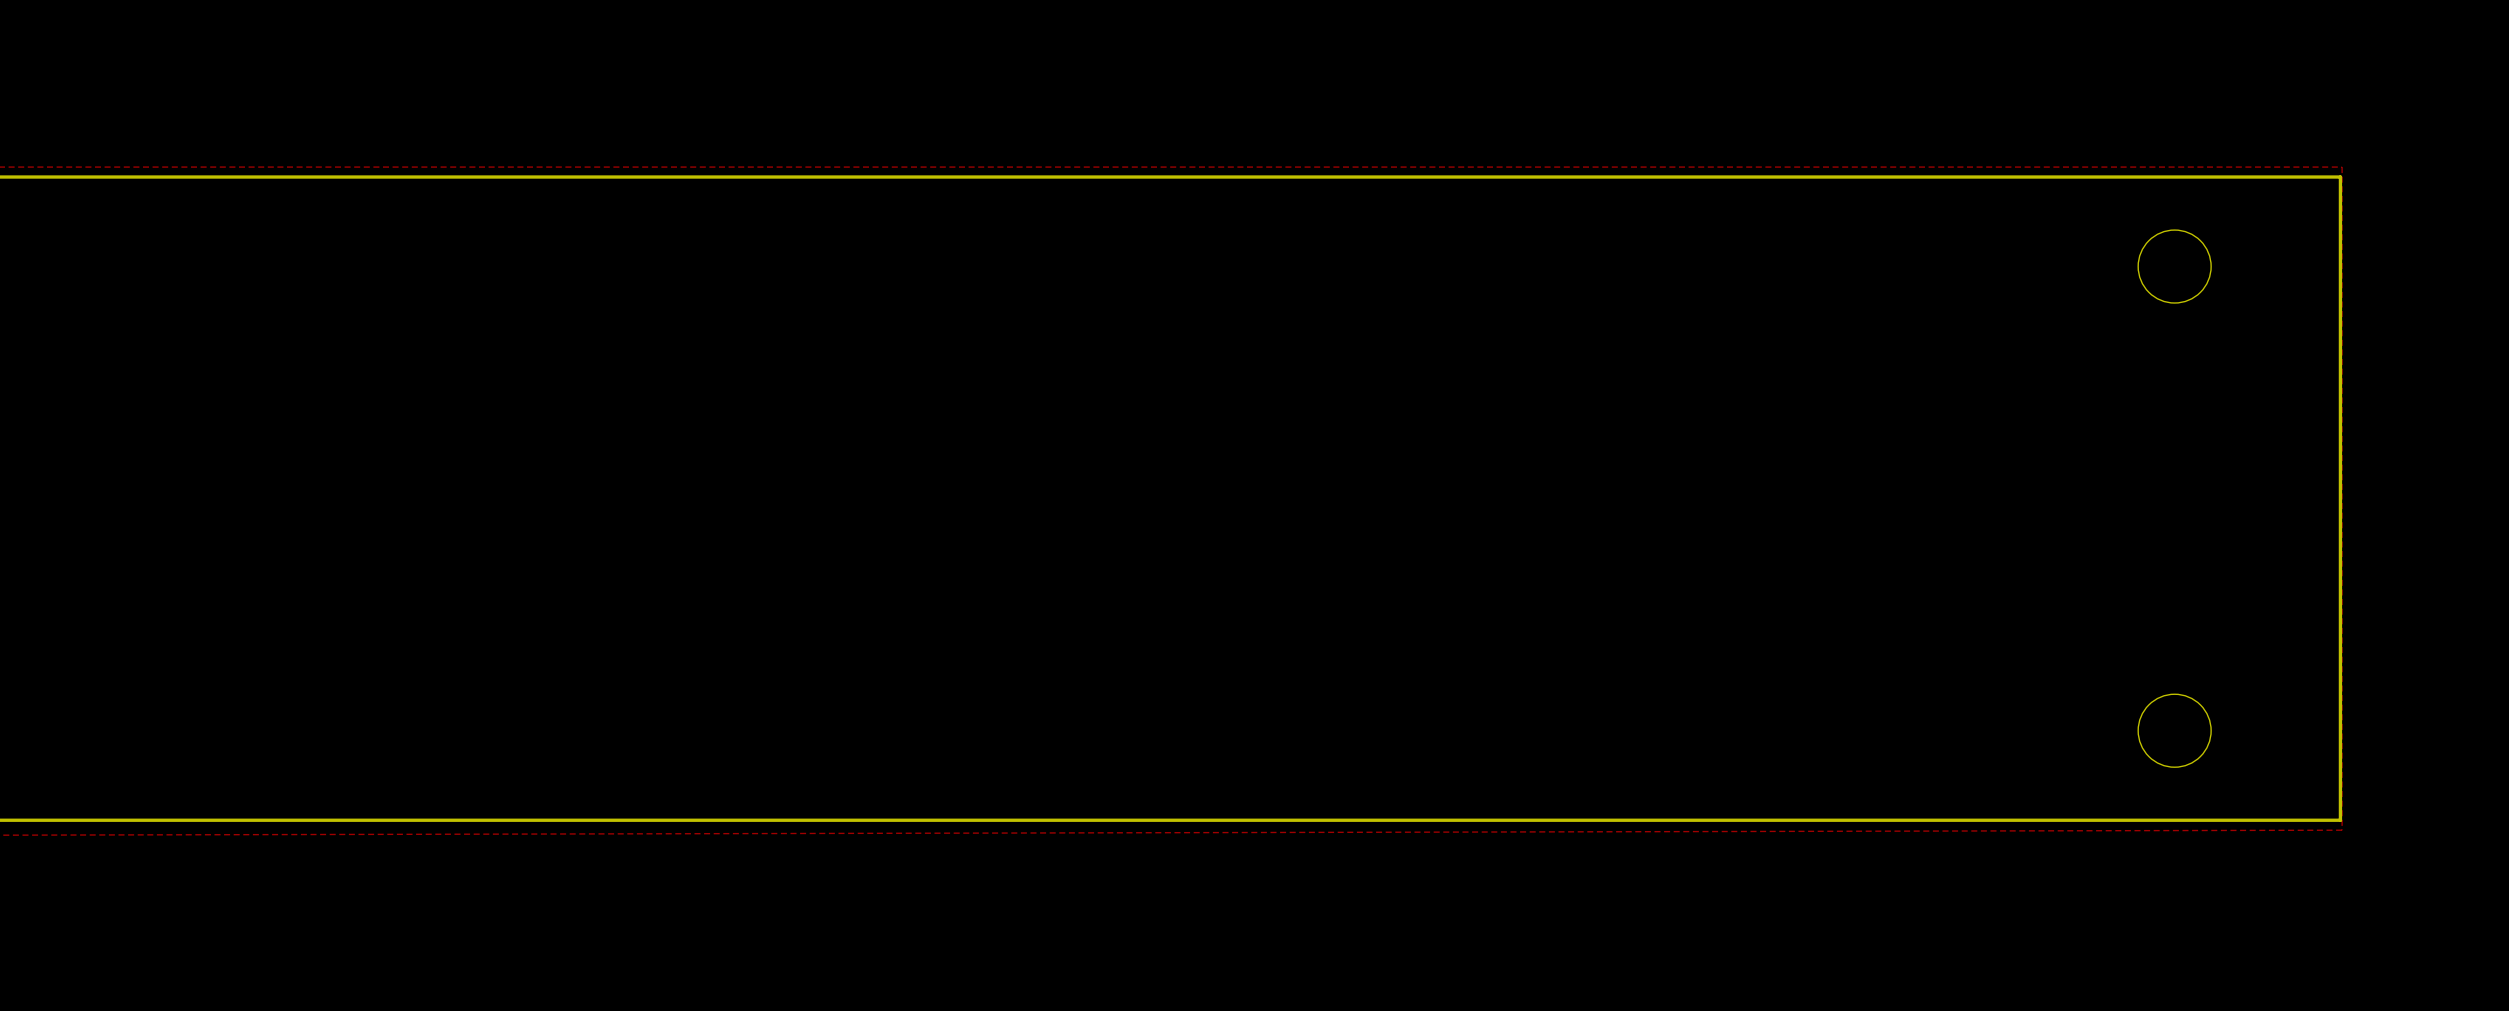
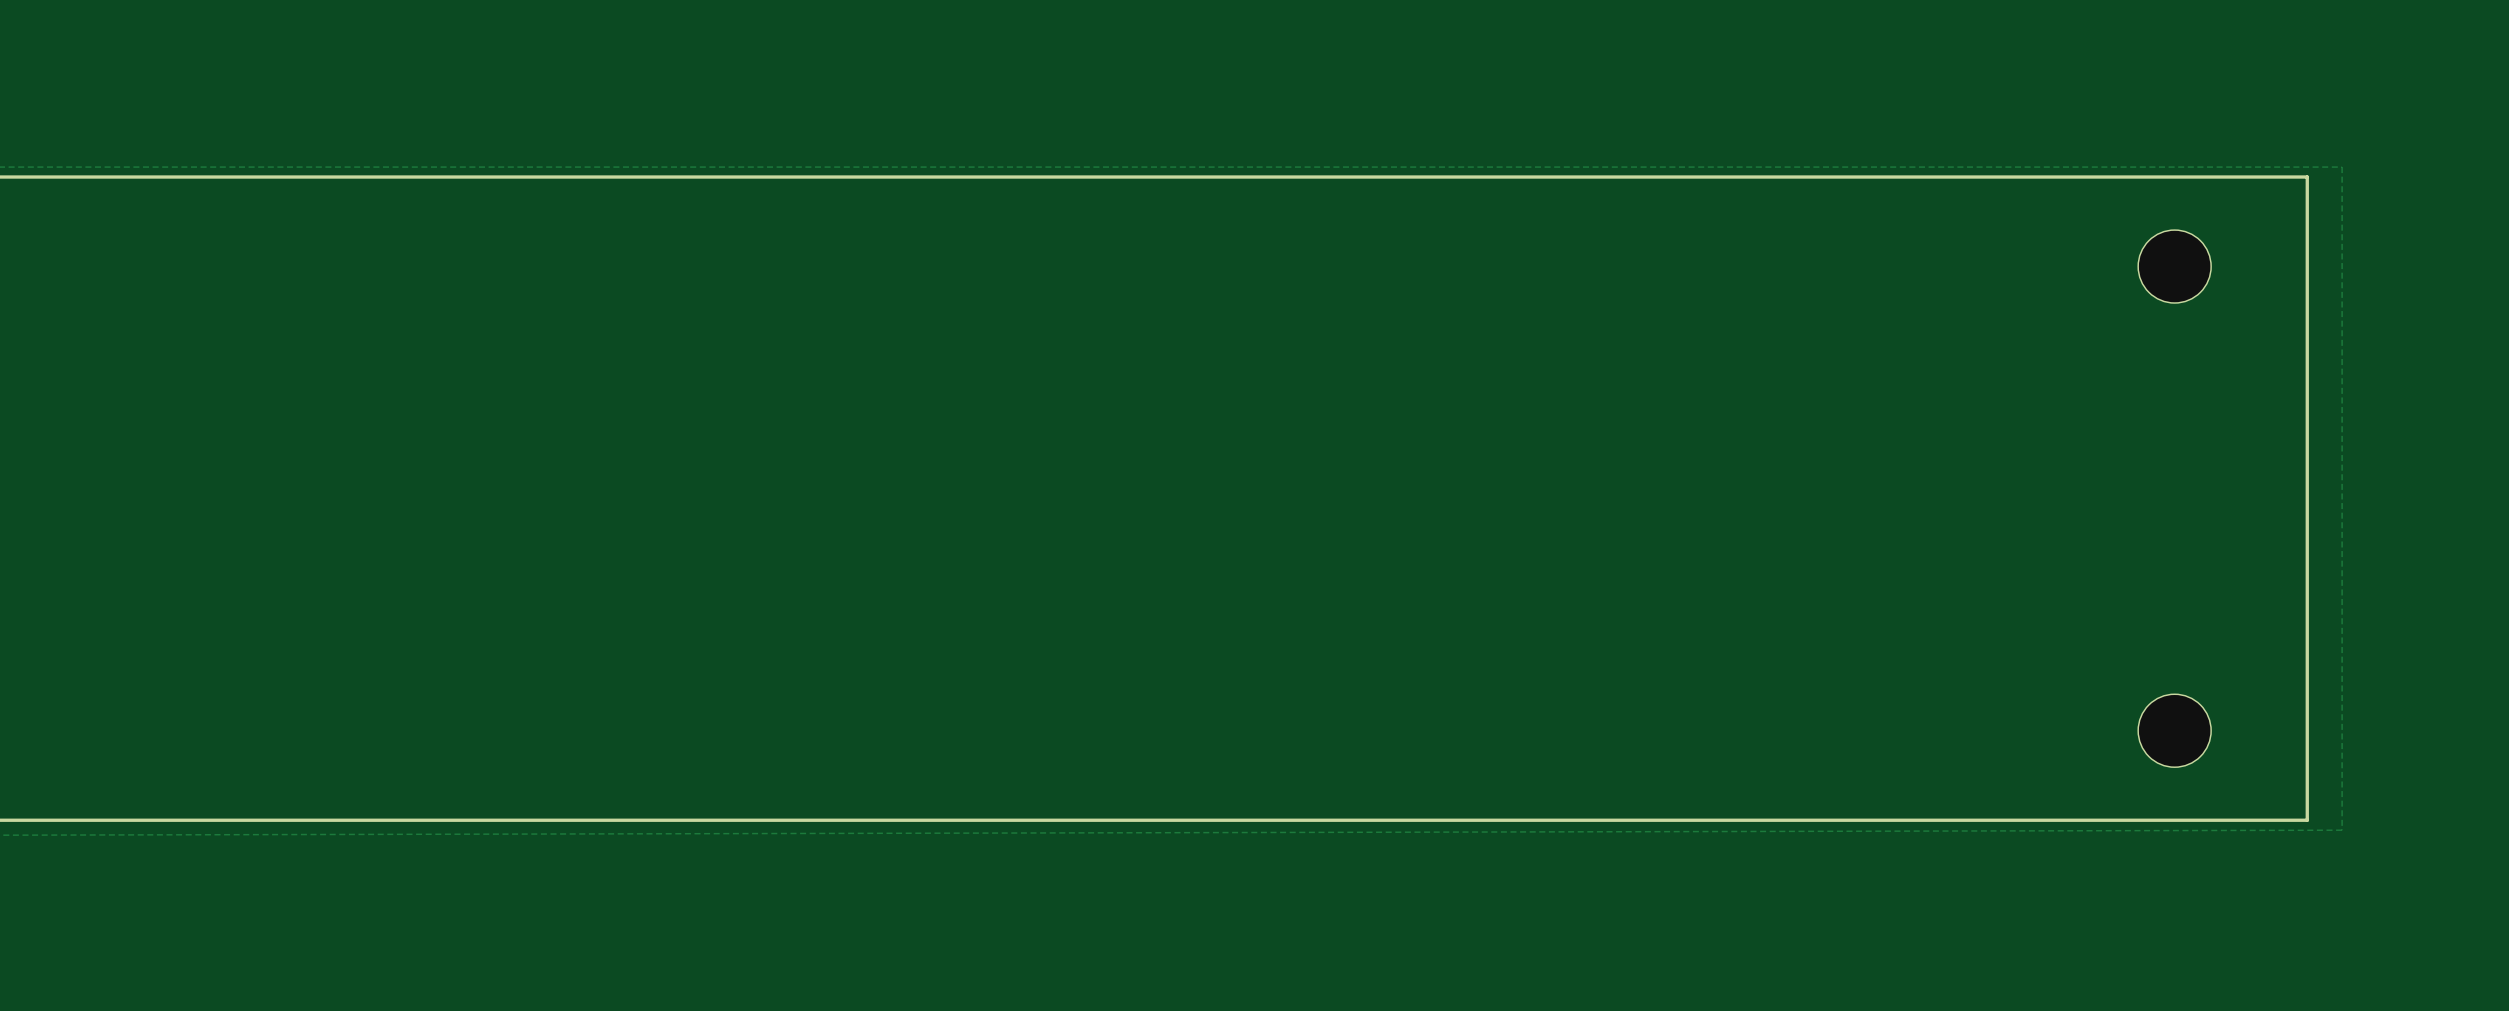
board edge: (2307, 177) (2340, 177) (2340, 820) (2307, 820) -> (2307, 177) (2307, 820)

